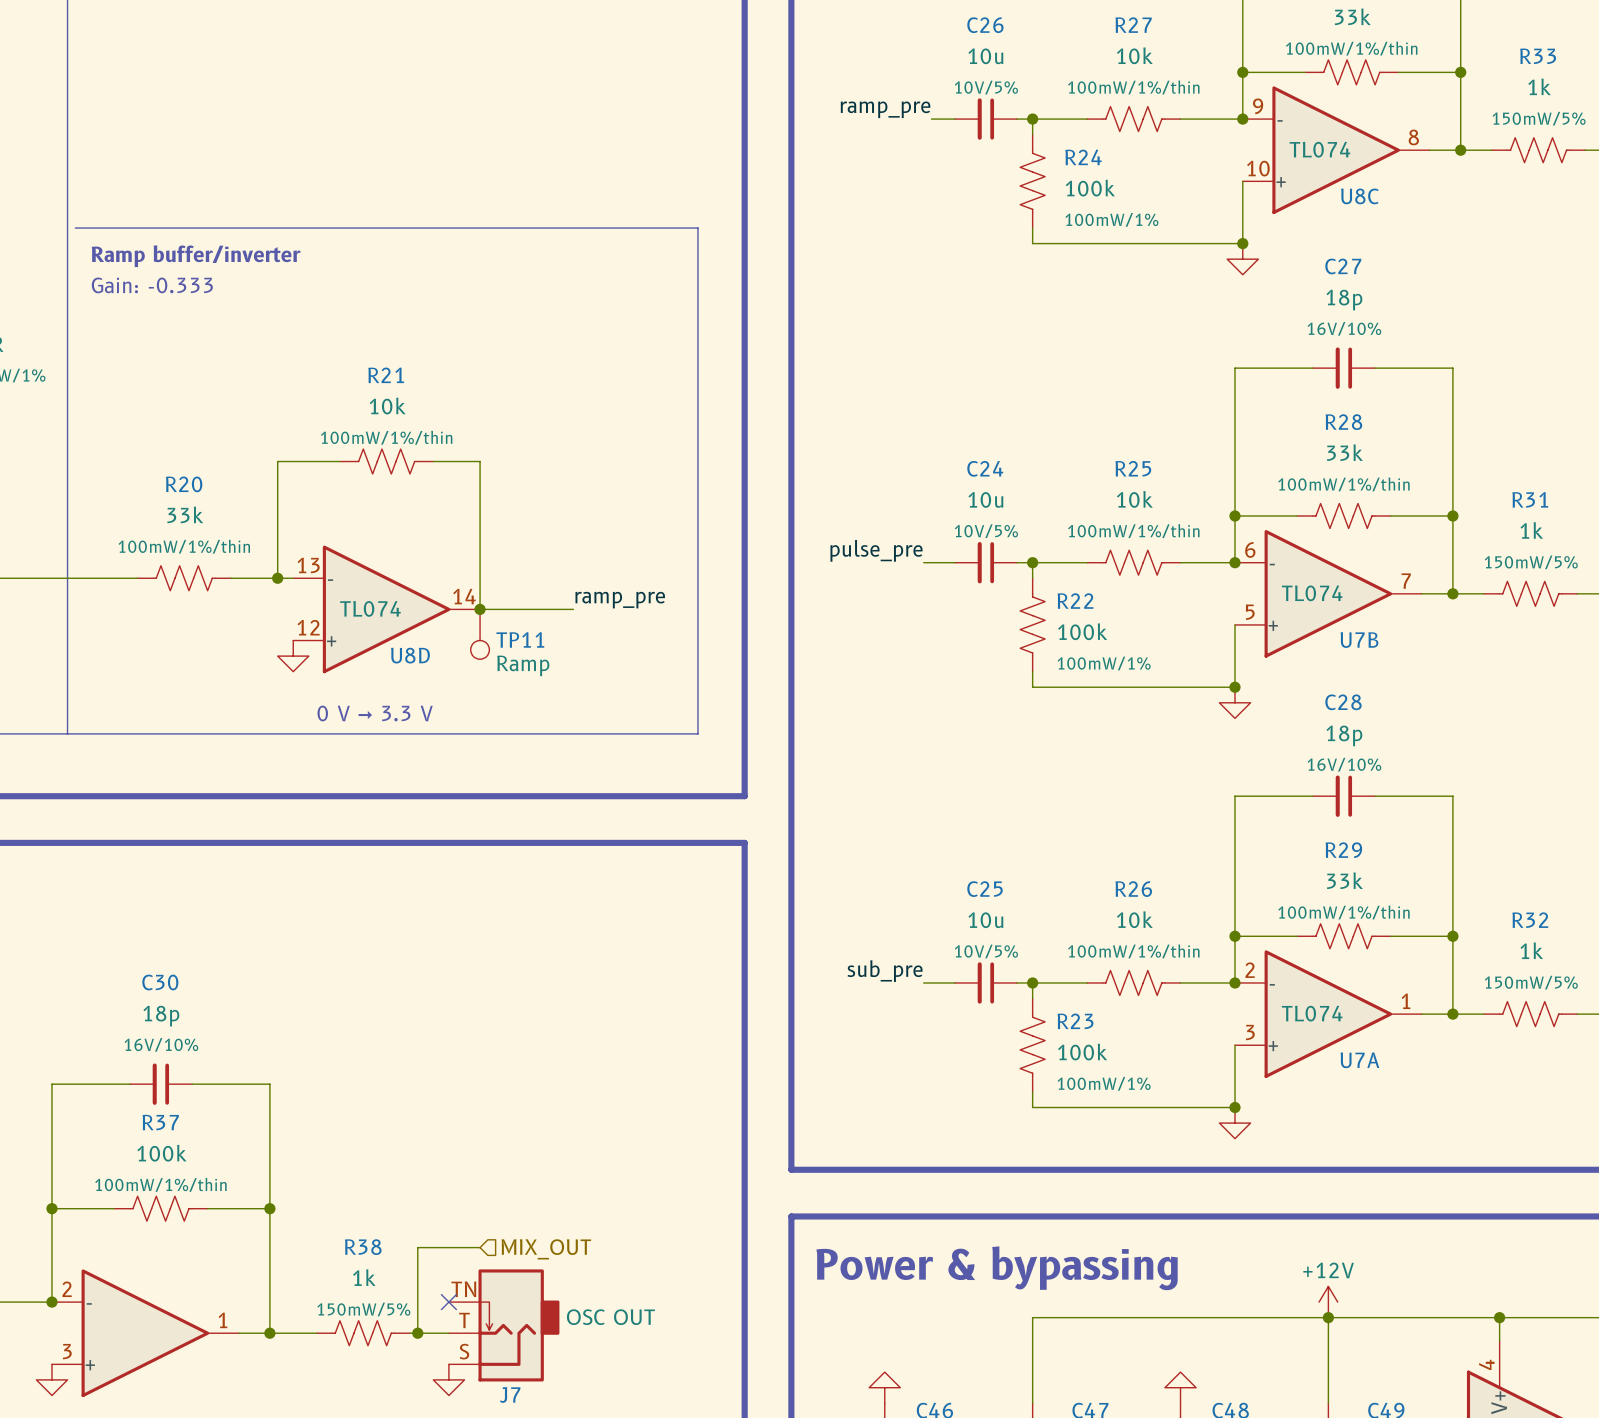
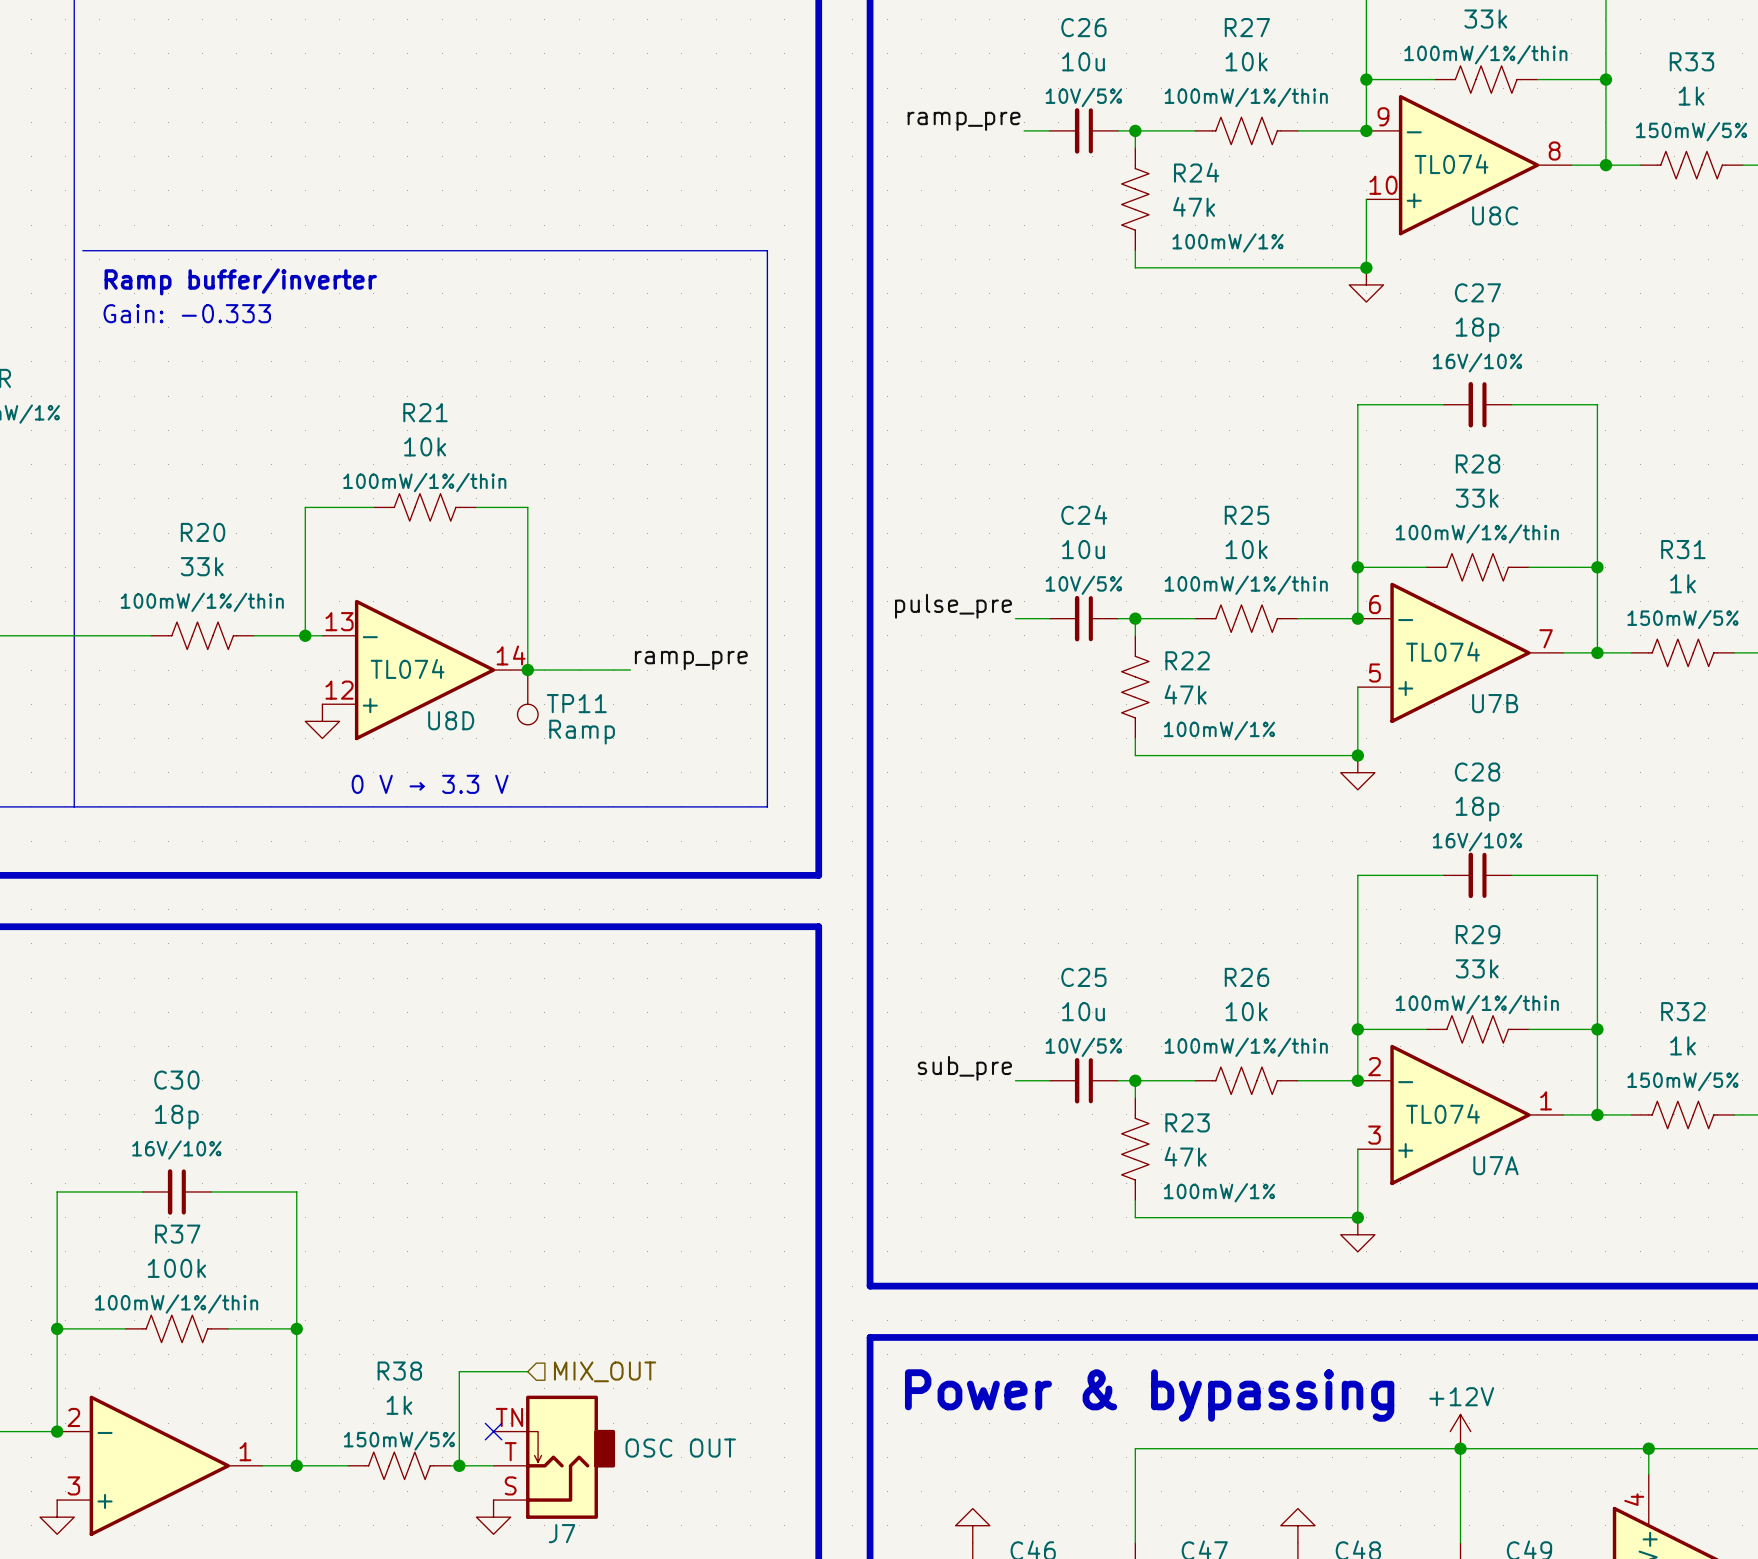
R24 value: 100k (1090, 188) -> 47k (1194, 206)
R22 value: 100k (1082, 631) -> 47k (1185, 694)
R23 value: 100k (1082, 1052) -> 47k (1185, 1156)

